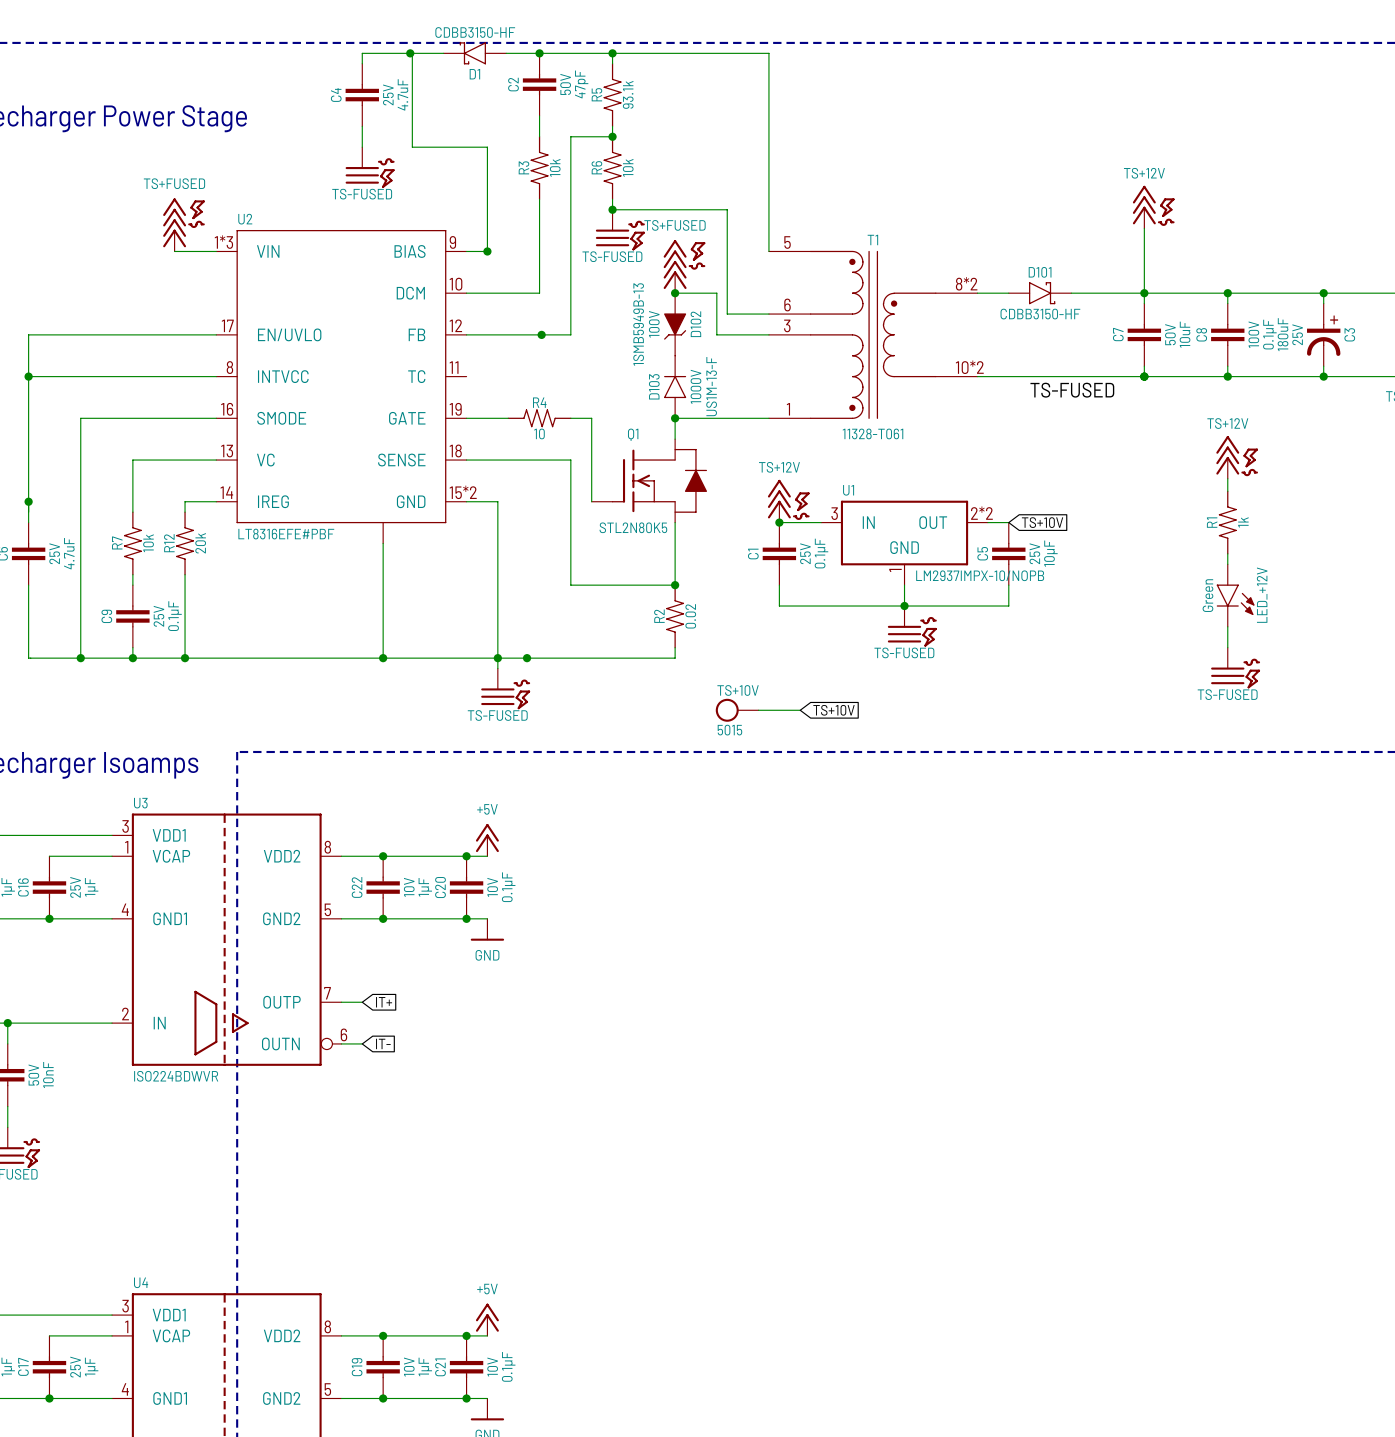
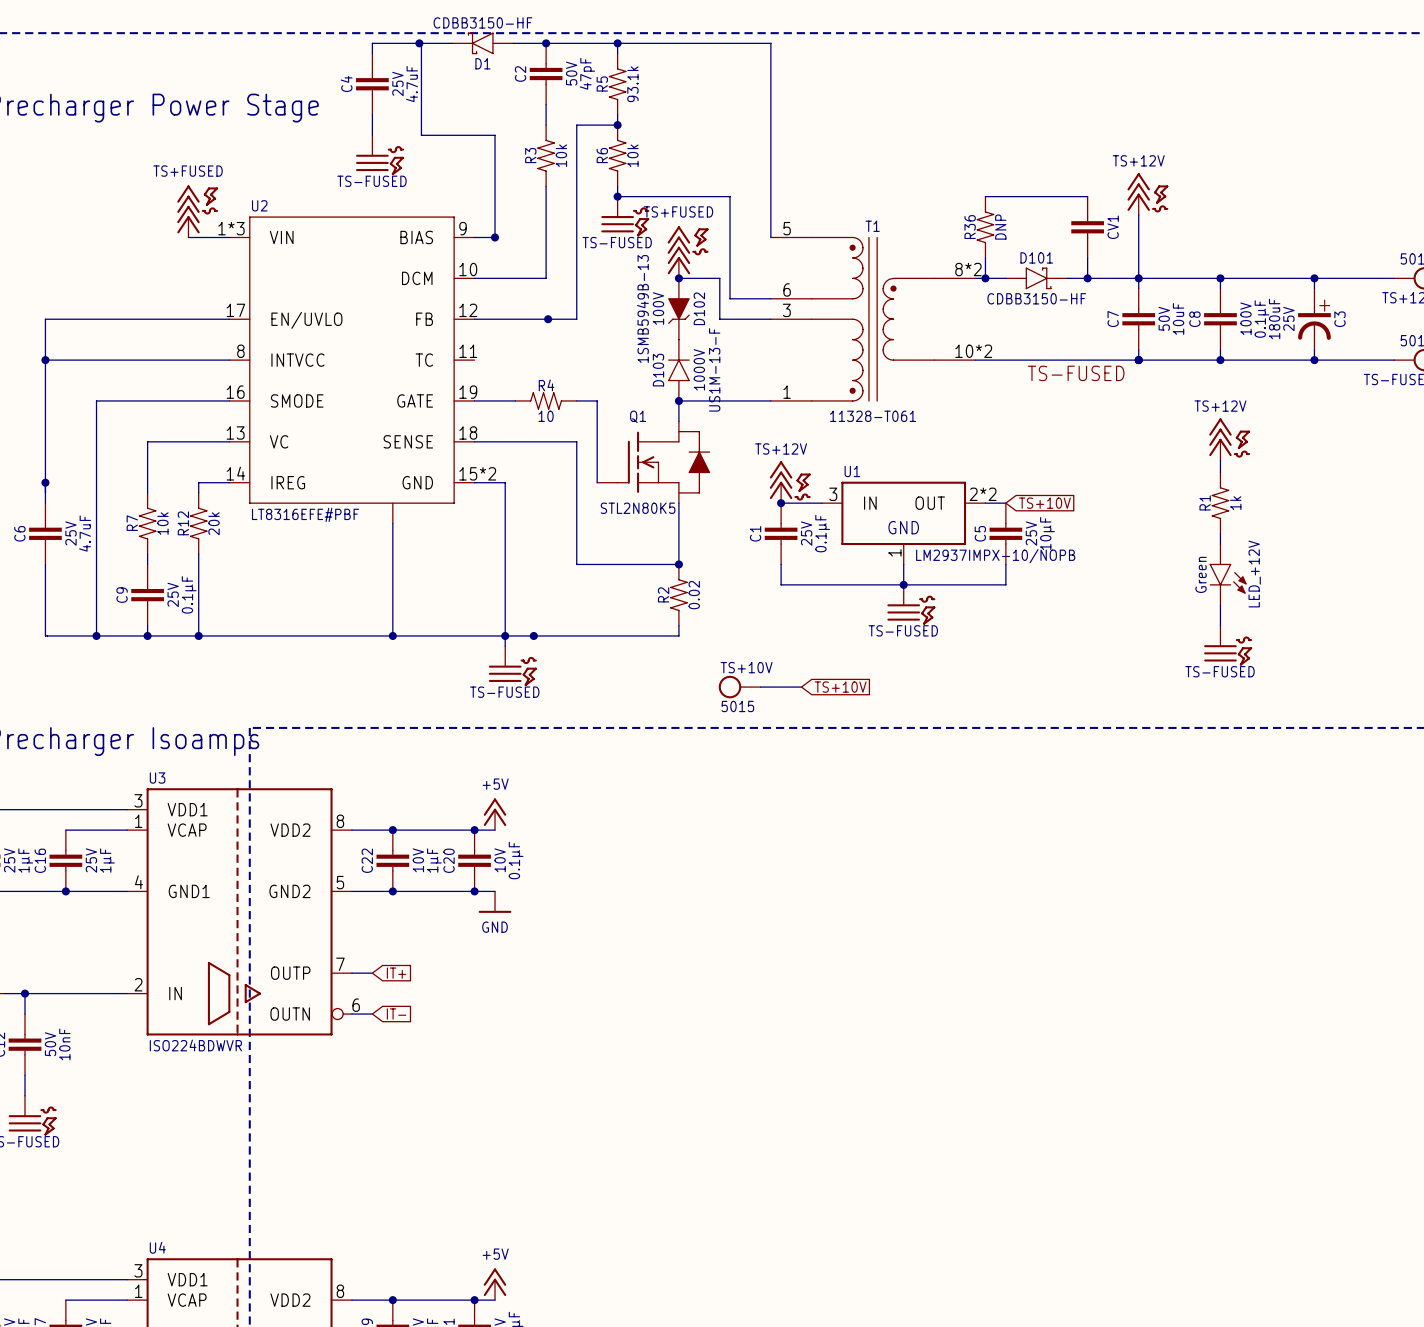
wire: none -> (985, 196) (1087, 196)
R36: none -> (985, 227)
CV1: none -> (1087, 227)
wire: none -> (985, 257) (985, 278)
wire: none -> (1087, 257) (1087, 278)
junction: none -> (985, 278)
junction: none -> (1087, 278)

